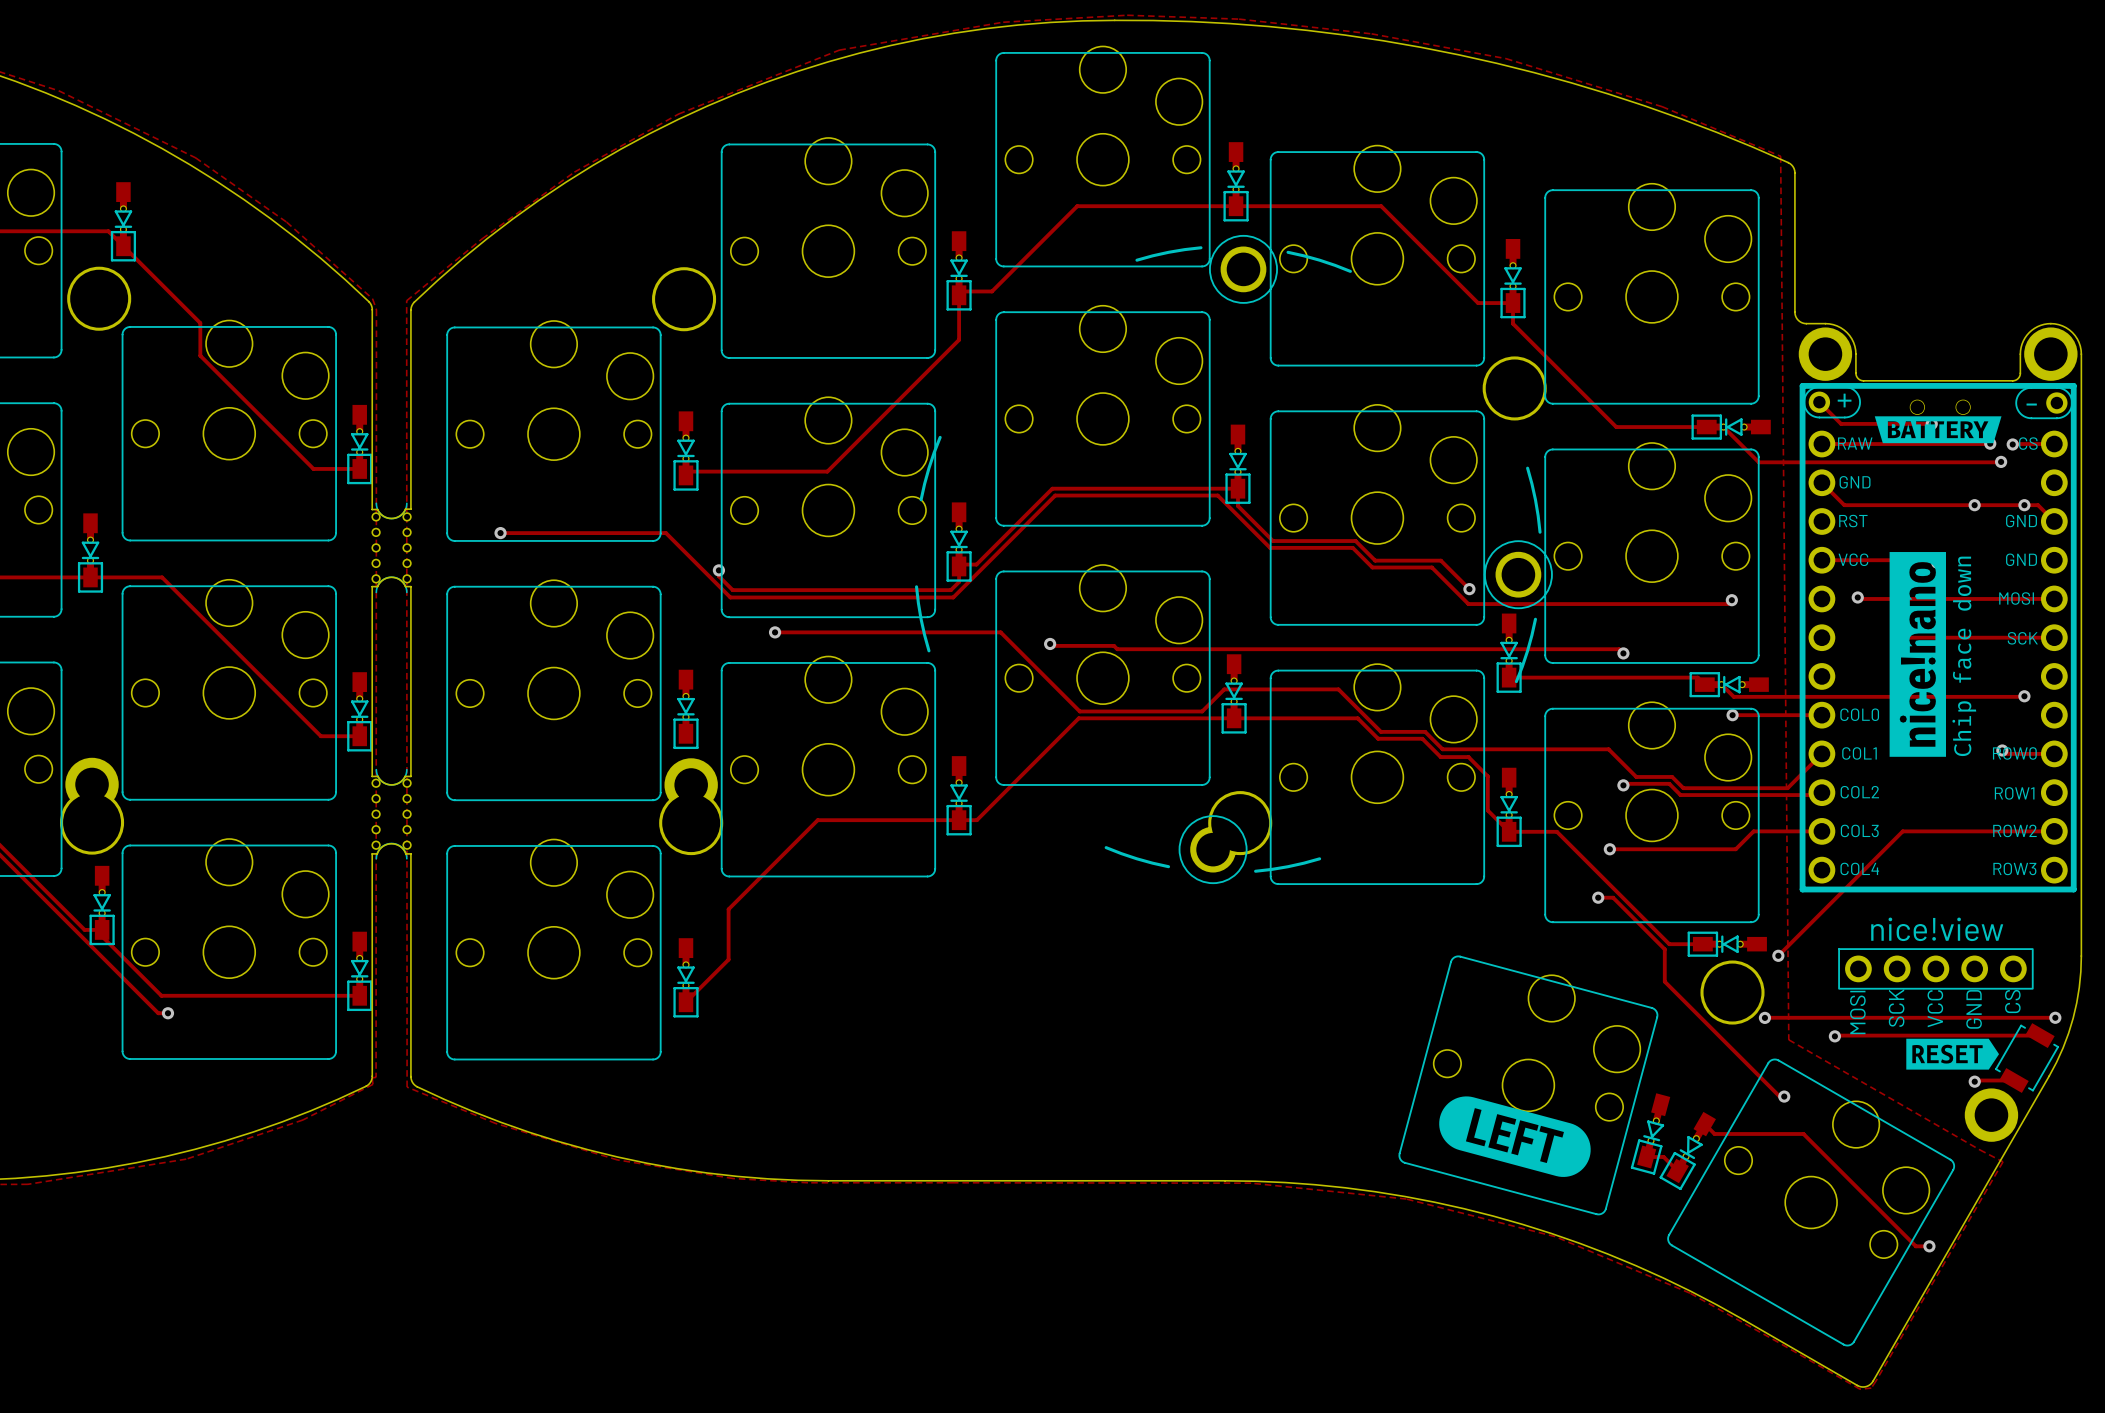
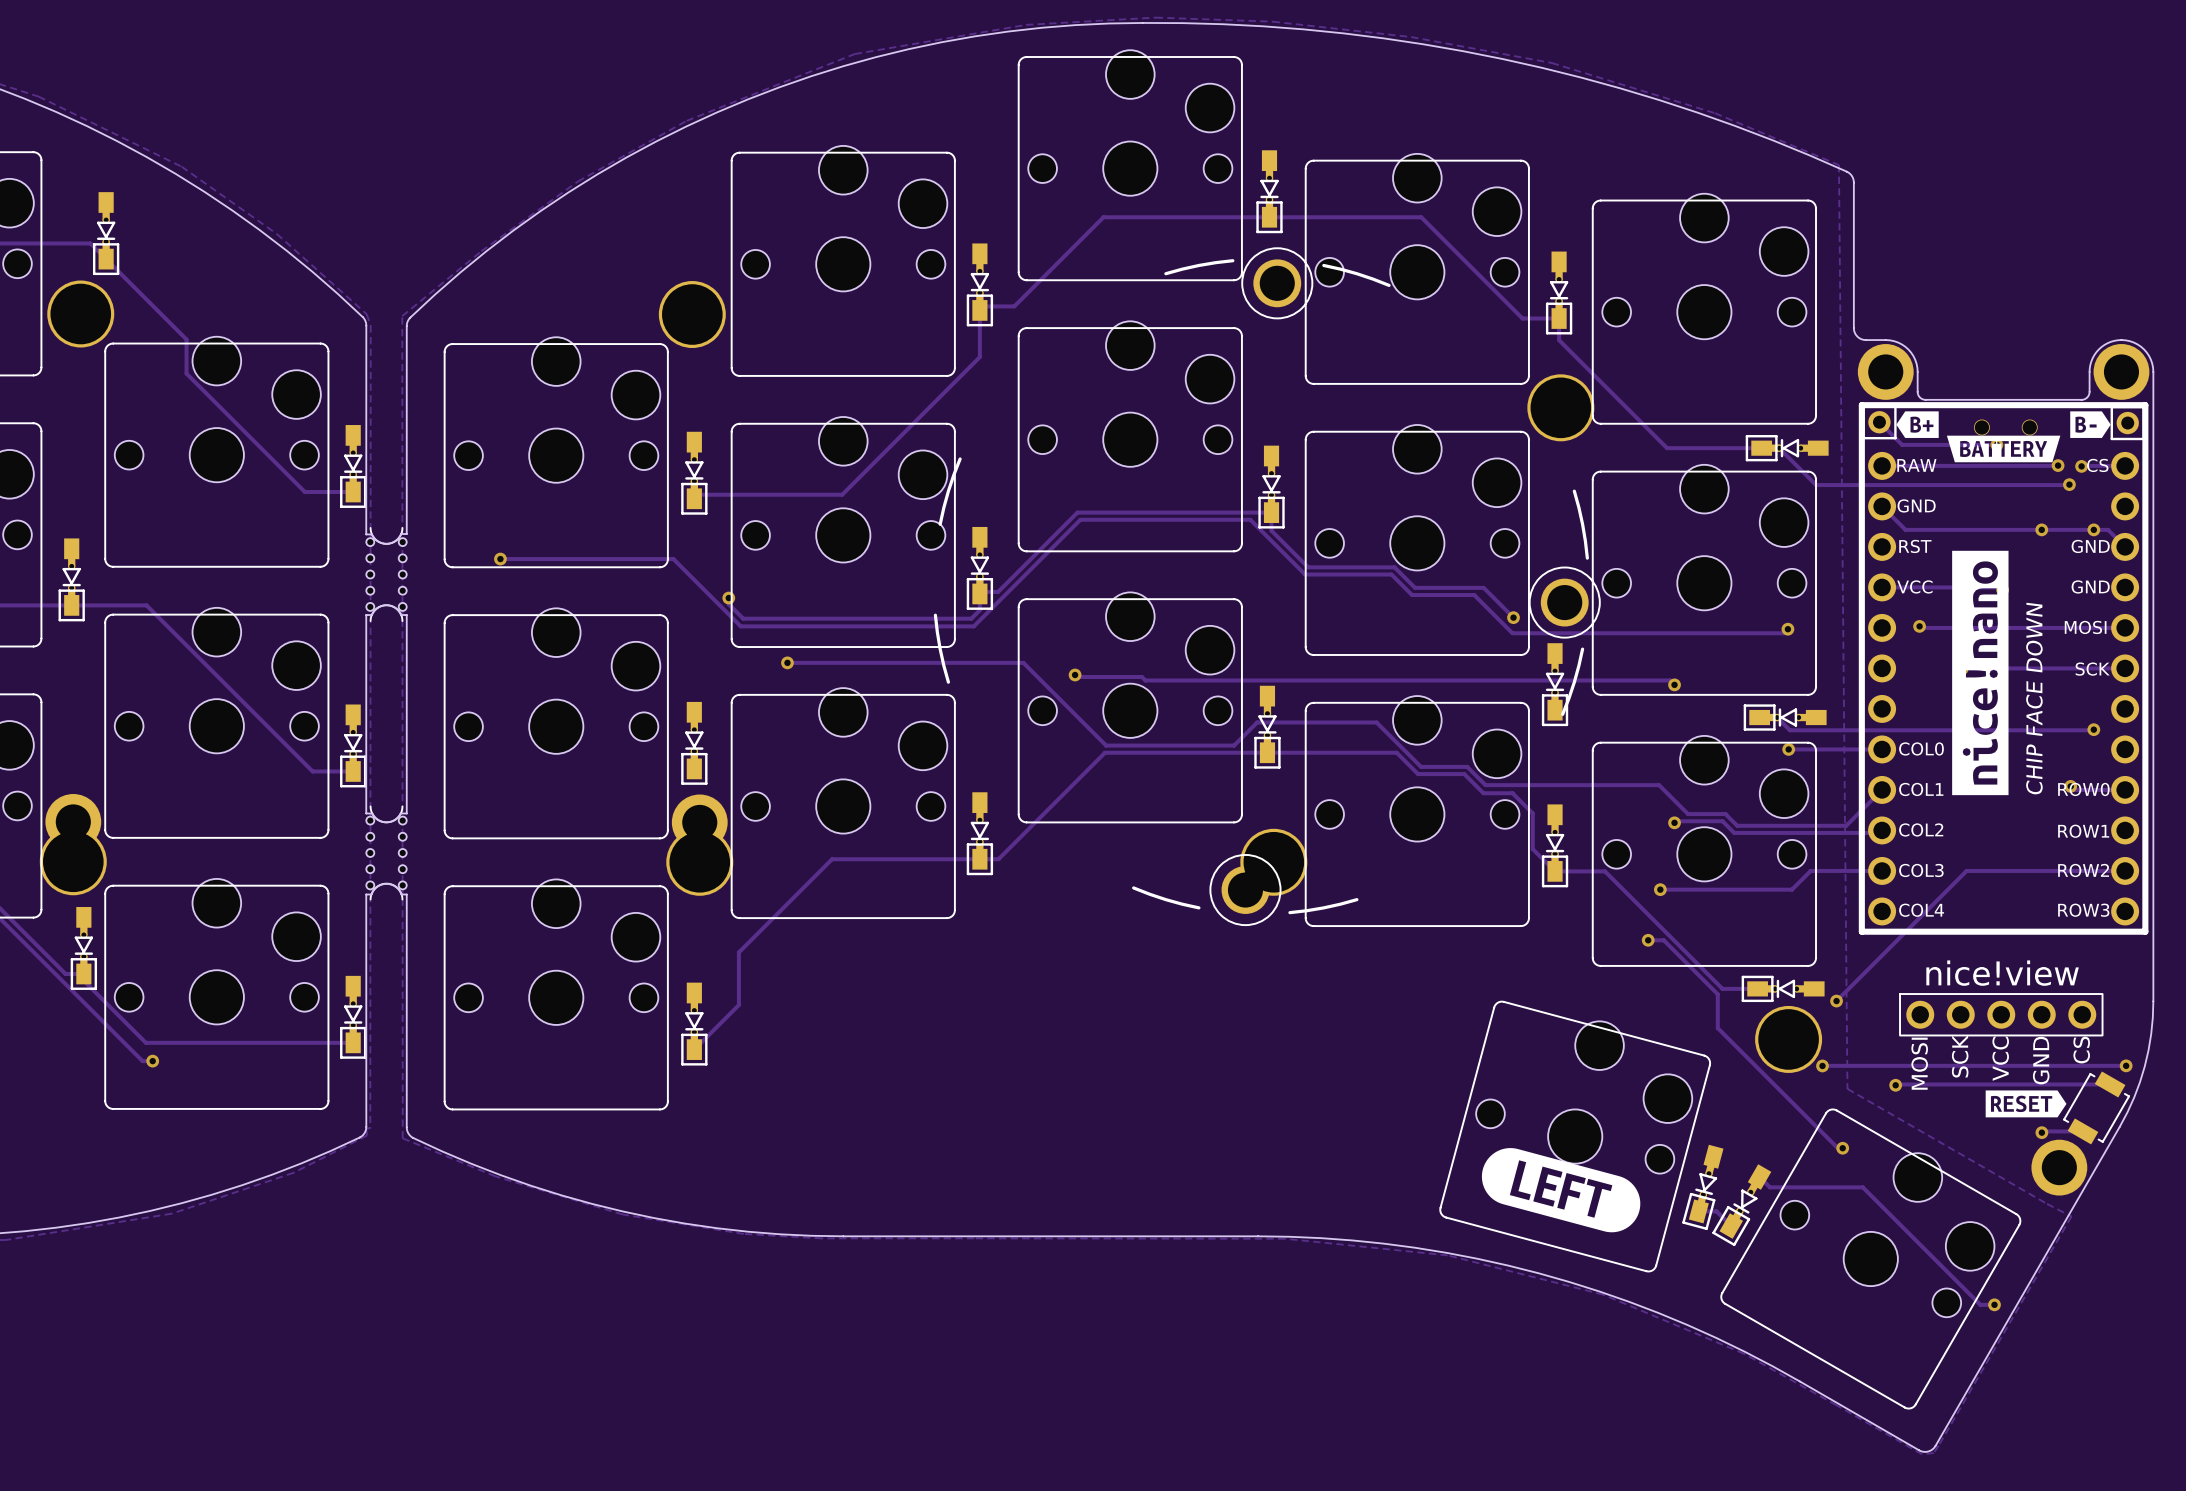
part footprint: [1803, 386, 1861, 419] -> [1862, 405, 1897, 440]
part footprint: [2015, 386, 2074, 420] -> [2110, 405, 2145, 441]
drawing: none -> [1896, 411, 1939, 438]
drawing: none -> [2070, 411, 2111, 438]
drawing shape: [1874, 416, 2002, 444] -> [1946, 435, 2061, 463]
drawing shape: [1889, 552, 1946, 757] -> [1952, 550, 2009, 796]
drawing: [1952, 556, 1977, 757] -> none
text: none -> CHIP FACE DOWN (2034, 698)
track: (1509, 677) (1697, 677) (1704, 684) -> none
drawing shape: [1906, 1038, 2000, 1070] -> [1985, 1090, 2067, 1118]

